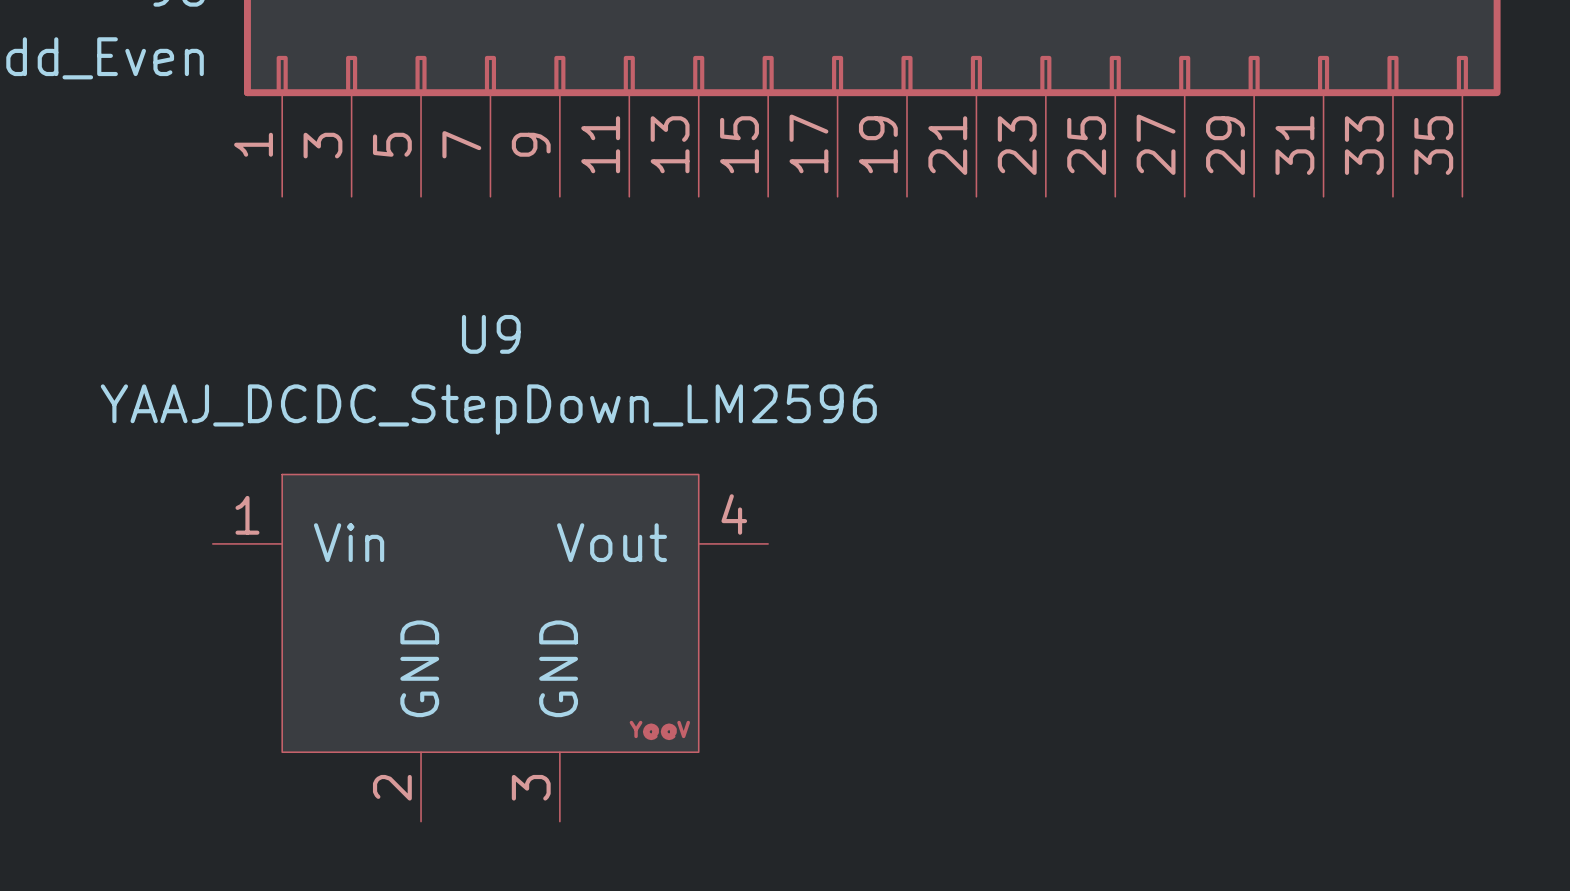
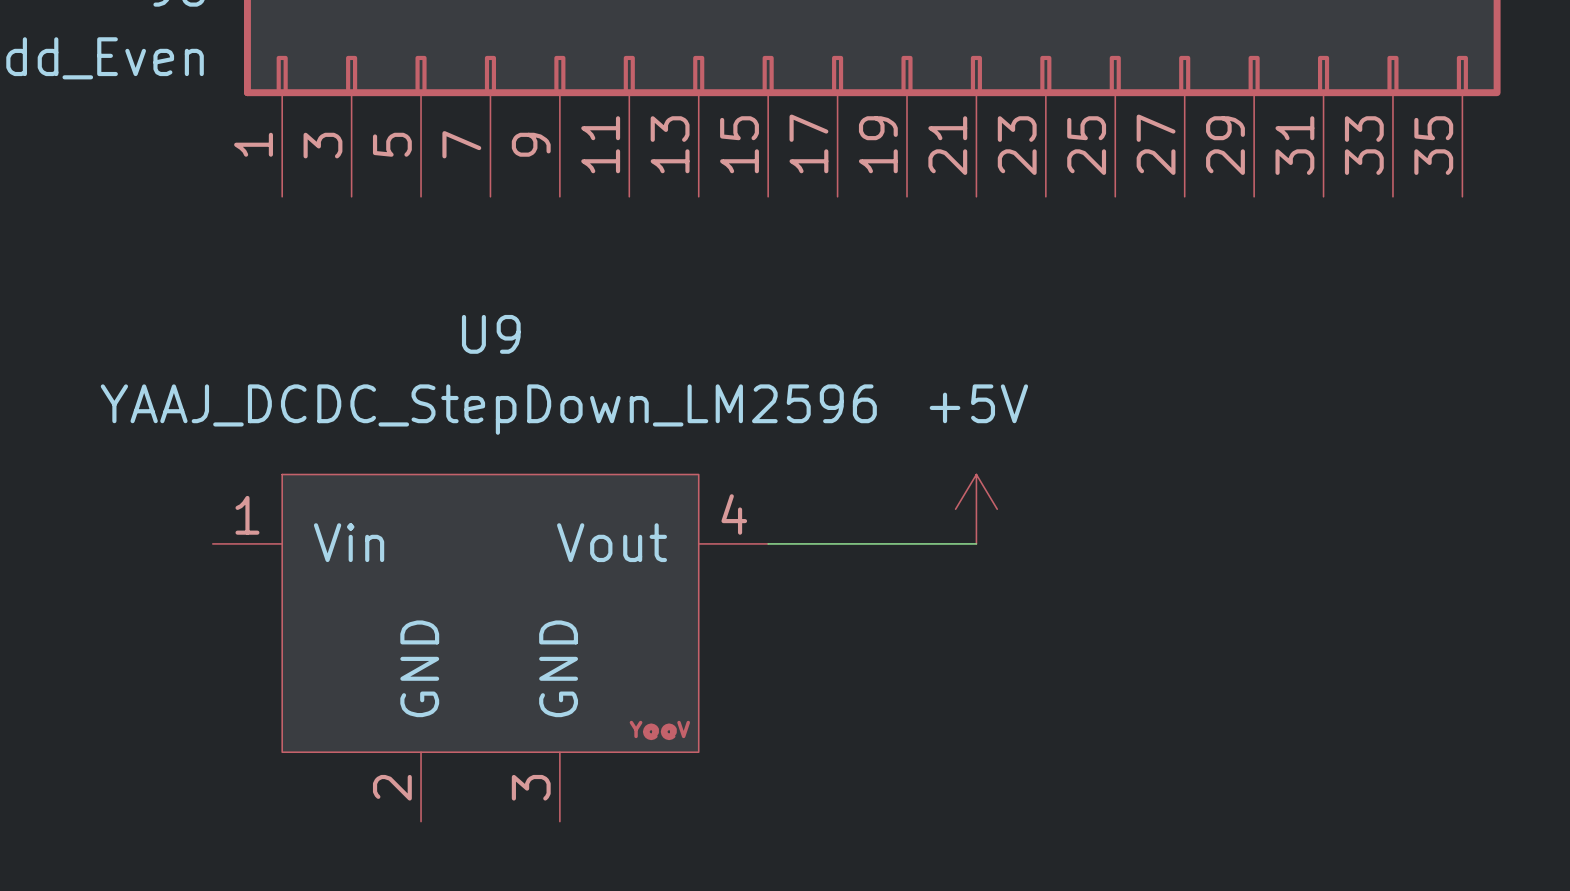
power symbol: none -> +5V (976, 509)
wire: none -> (768, 543) (976, 543)

